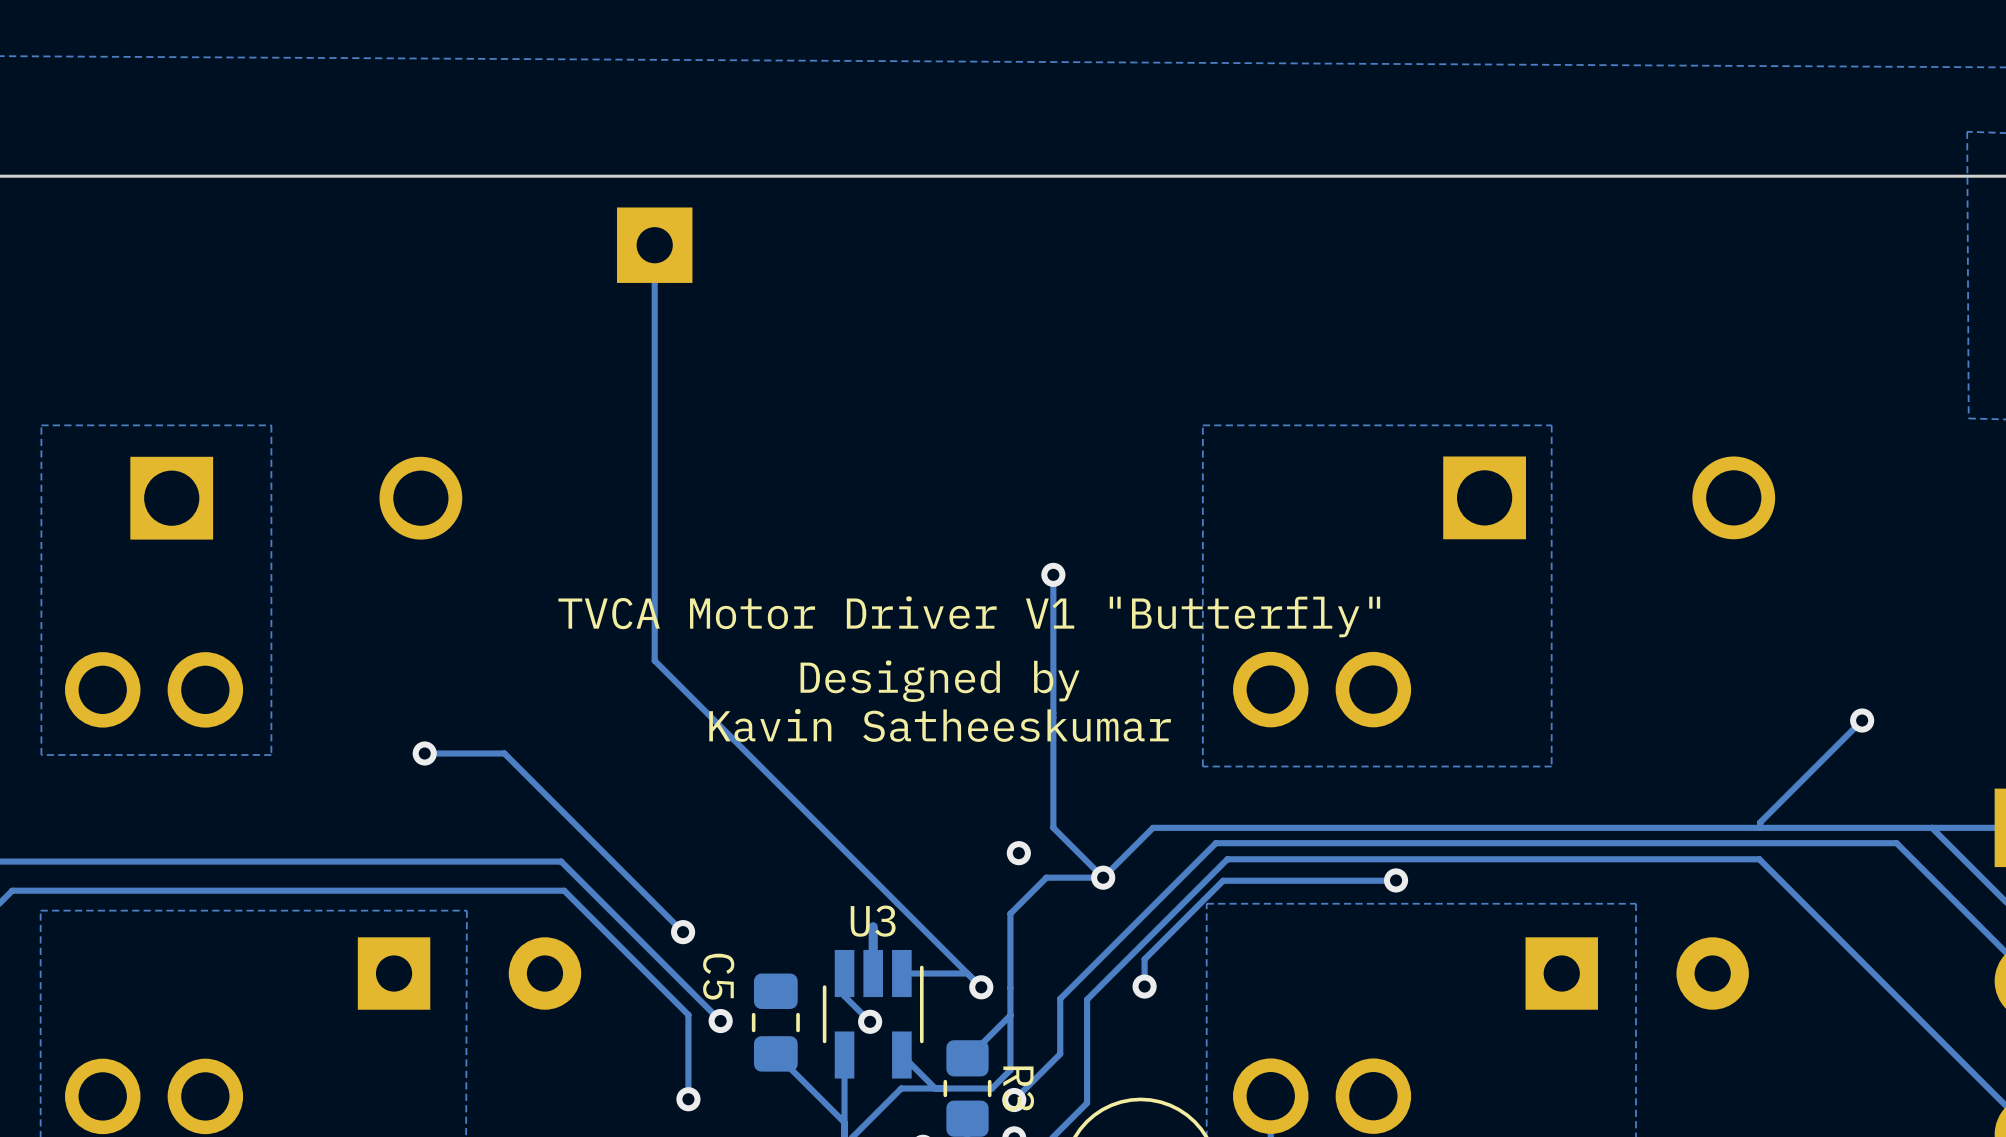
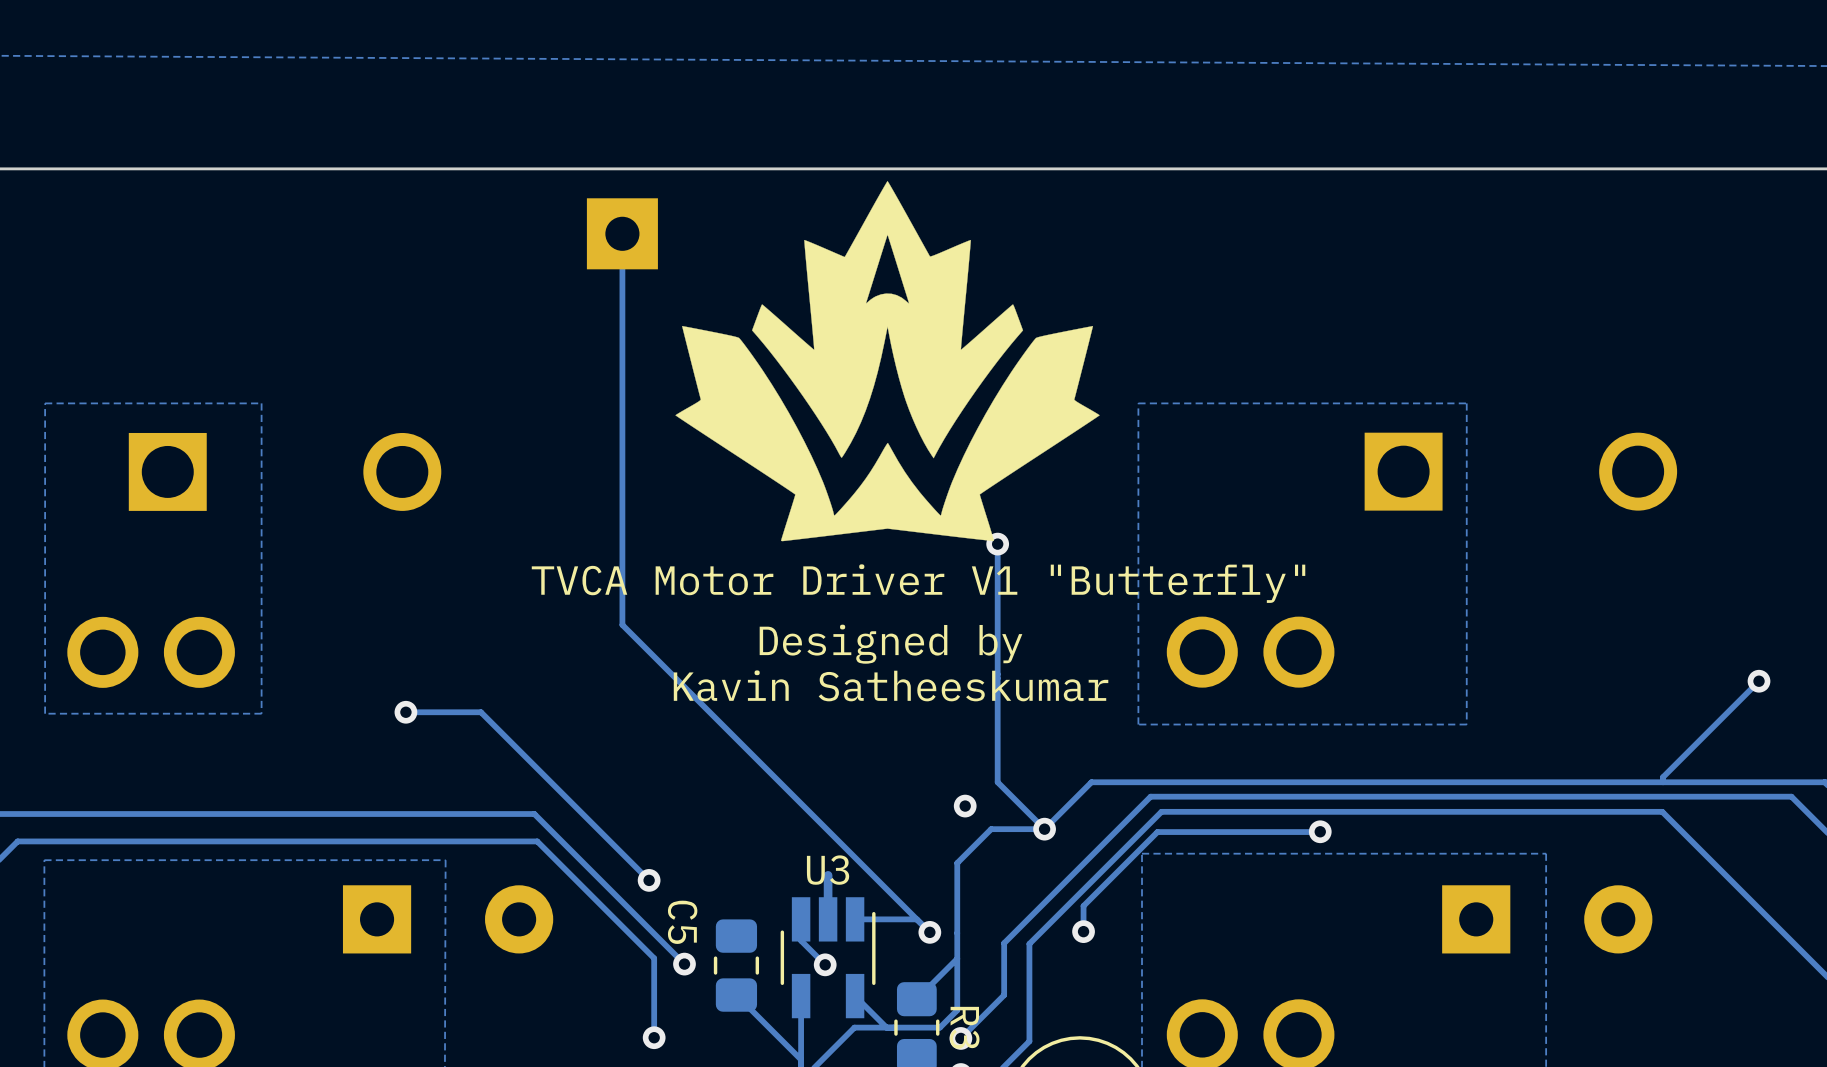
drawing: none -> [675, 181, 1100, 542]

